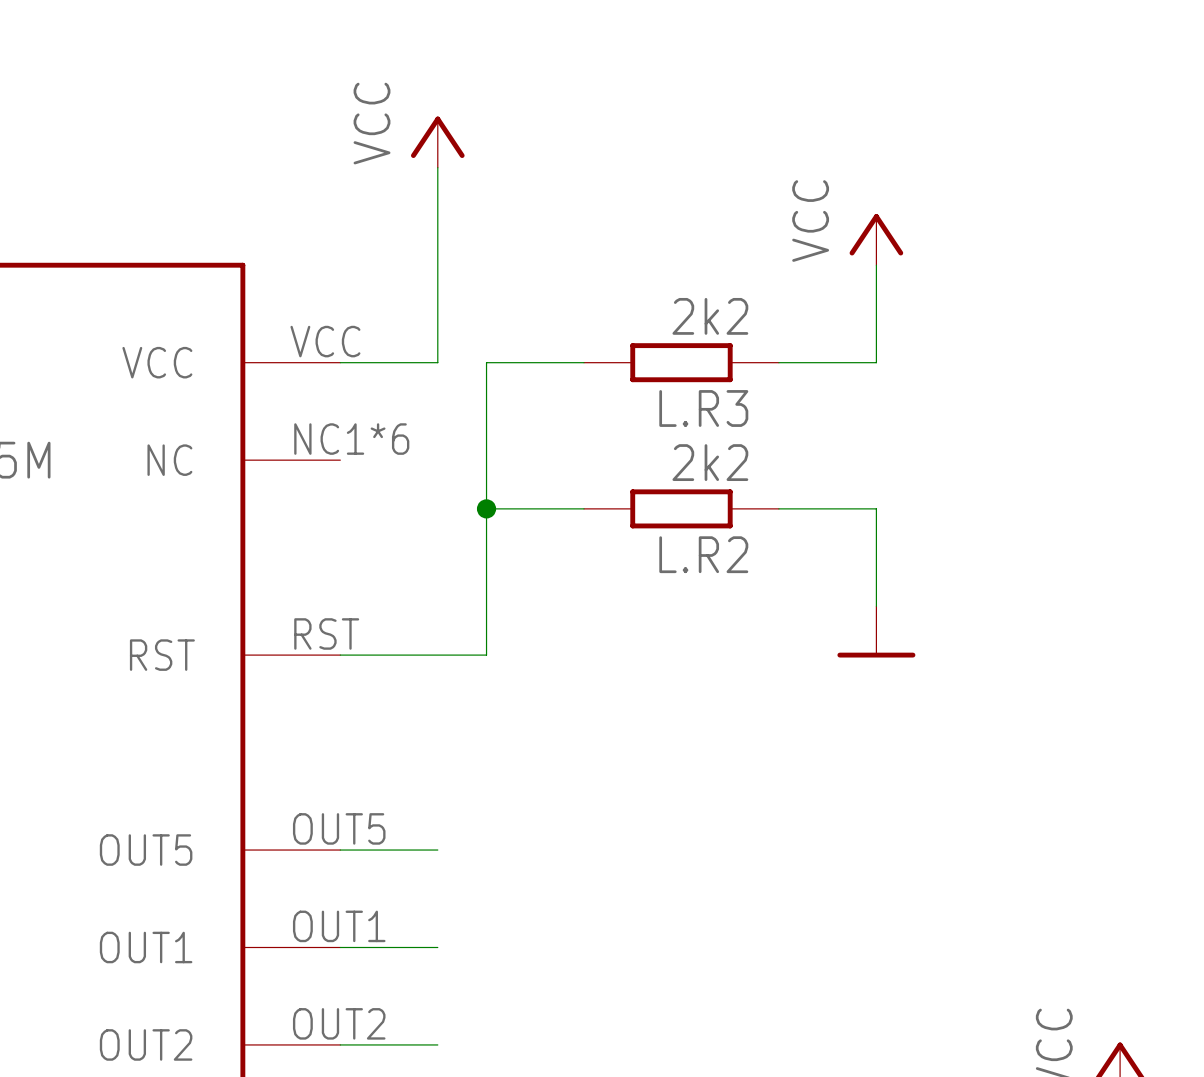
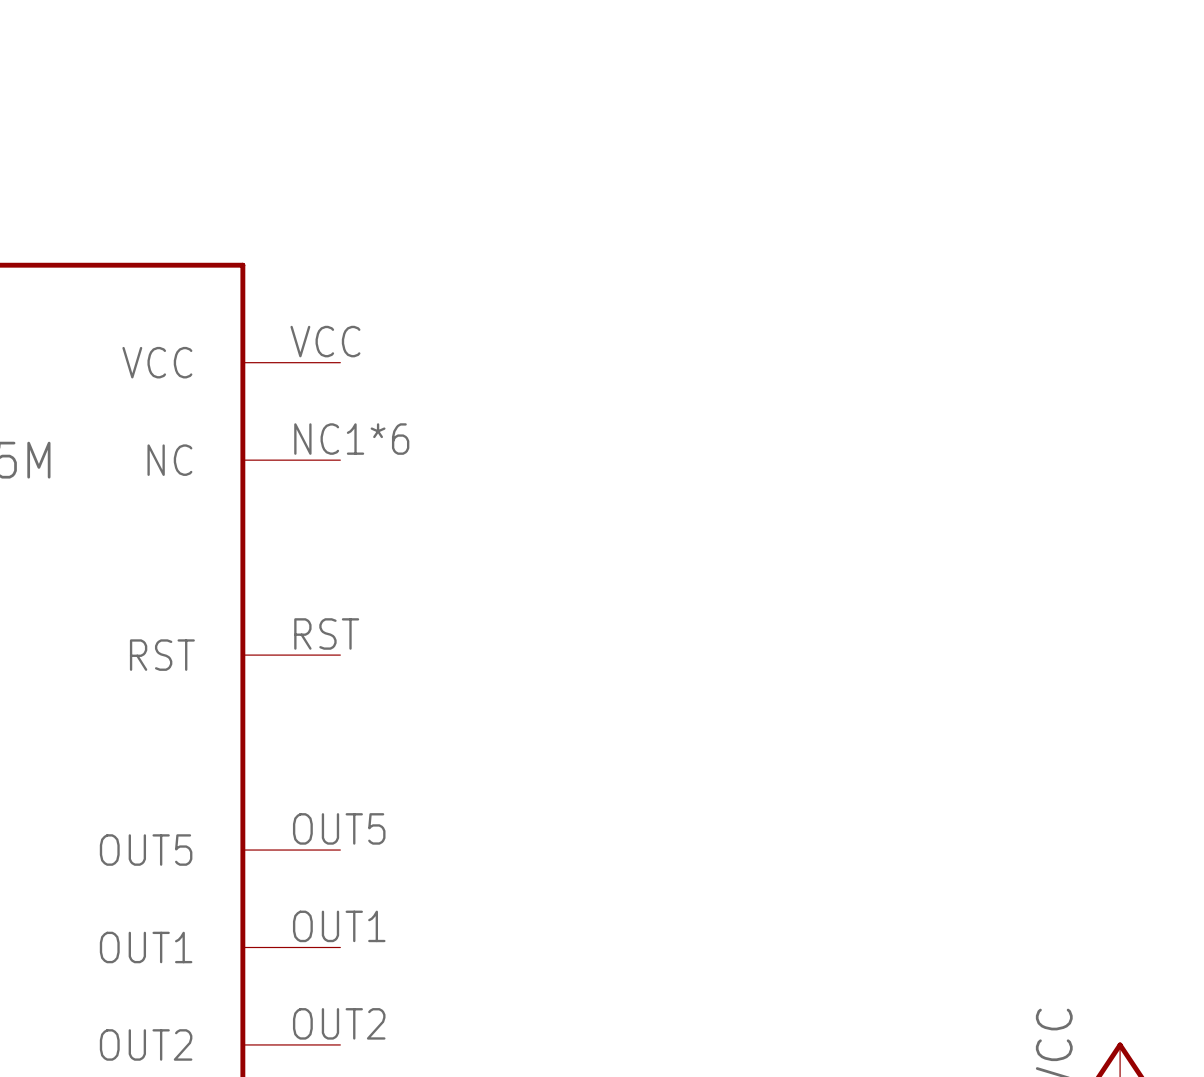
power symbol: VCC (437, 142) -> none
wire: (437, 167) (437, 362) (340, 362) -> none
power symbol: VCC (876, 239) -> none
wire: (876, 265) (876, 362) (778, 362) -> none
wire: (584, 362) (486, 362) (486, 655) (340, 655) -> none
L.R3: 2k2 (681, 362) -> none
wire: (486, 508) (584, 508) -> none
junction: (486, 508) -> none
L.R2: 2k2 (681, 508) -> none
wire: (778, 508) (876, 508) (876, 606) -> none
power symbol: (876, 631) -> none
wire: (340, 850) (437, 850) -> none
wire: (340, 947) (437, 947) -> none
wire: (340, 1044) (437, 1044) -> none

